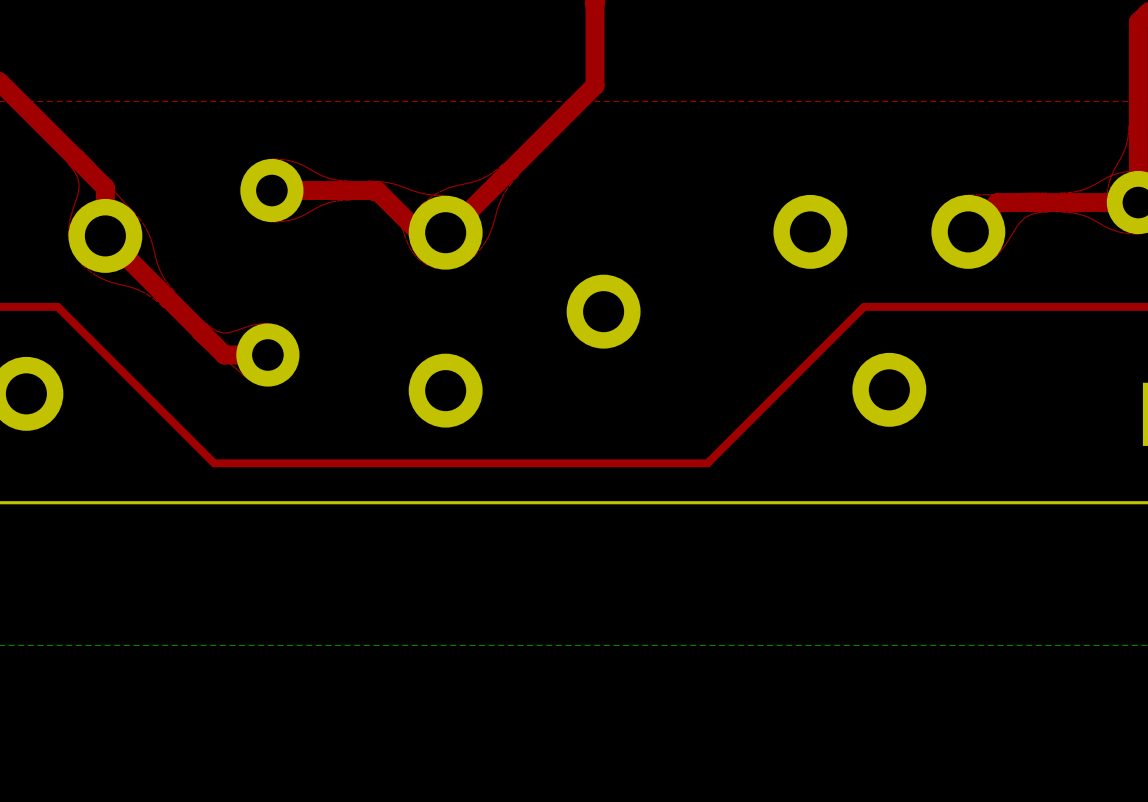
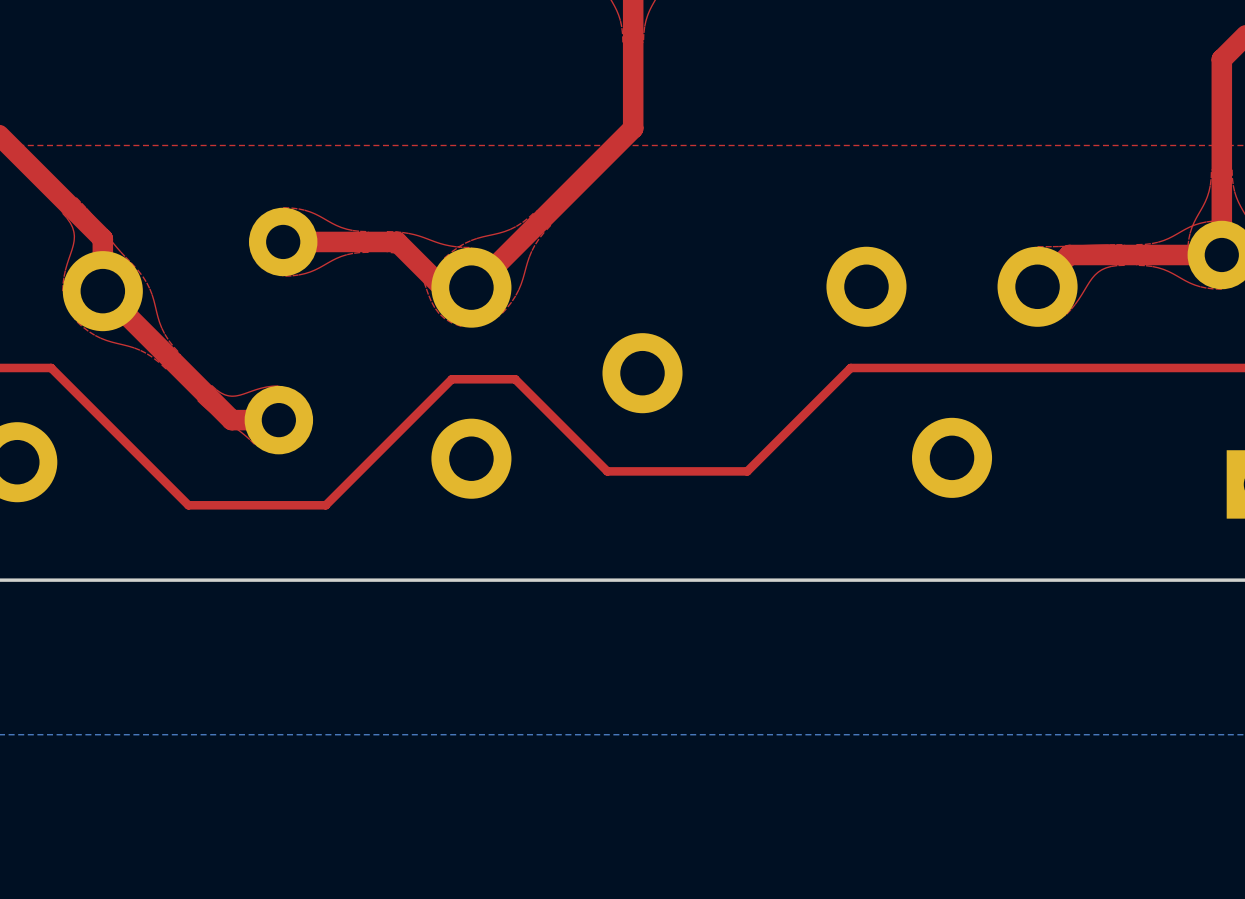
top track: (864, 306) (707, 463) (214, 463) (184, 433) -> (924, 367) (850, 367) (747, 471) (607, 471) (515, 379) (451, 379) (325, 505) (188, 505)

